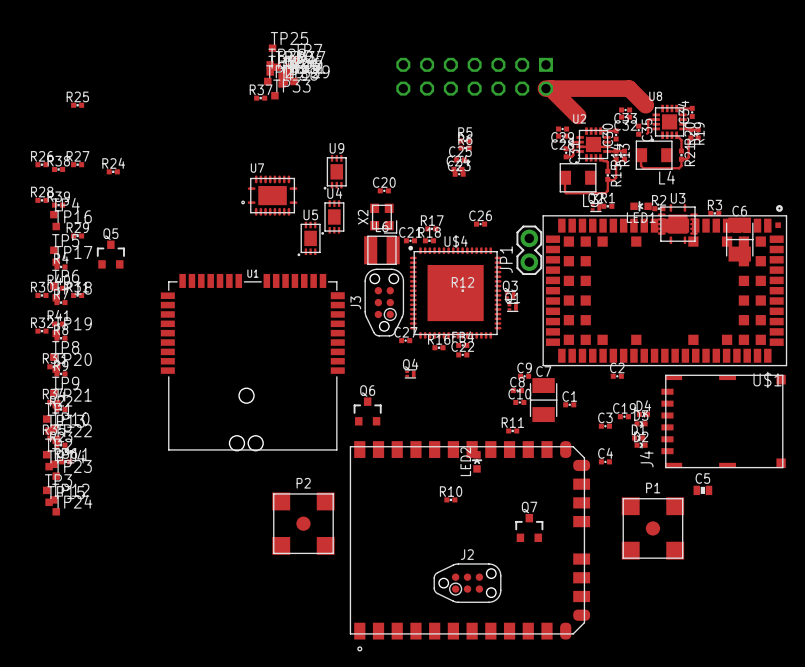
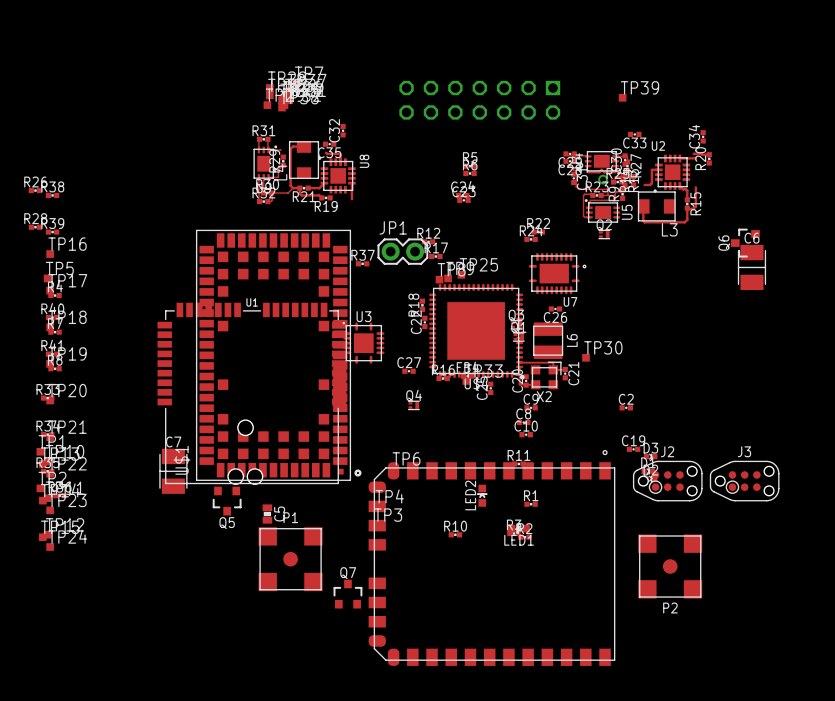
TP25 position: (272, 48) -> (461, 274)
TP30 position: (277, 67) -> (585, 357)
TP39 position: (293, 81) -> (622, 97)
track: (545, 88) (629, 88) (645, 105) -> none
track: (550, 88) (578, 115) -> none
TP33 position: (274, 95) -> (466, 380)
R37 position: (260, 98) -> (362, 263)
R25 position: (77, 105) -> (617, 182)
track: (692, 108) (676, 108) -> none
track: none -> (259, 139) (258, 150)
track: none -> (267, 139) (268, 150) (280, 150)
C32 rotation: 0° (625, 117) -> 90° clockwise (343, 130)
C32 position: (625, 117) -> (343, 130)
track: (656, 119) (648, 120) (647, 133) -> none
track: none -> (304, 147) (293, 146) (290, 149) (290, 185) (293, 188)
U8 rotation: 0° (668, 123) -> 90° clockwise (337, 175)
U8 position: (668, 123) -> (337, 175)
track: none -> (325, 152) (339, 153) (340, 162)
track: none -> (568, 155) (588, 156)
track: (616, 130) (600, 130) -> (695, 158) (679, 158)
C35 rotation: 0° (638, 130) -> 90° clockwise (329, 144)
C35 position: (638, 130) -> (329, 144)
track: none -> (615, 156) (626, 156) (627, 161)
R19 rotation: 0° (690, 133) -> 90° clockwise (325, 197)
R19 position: (690, 133) -> (325, 197)
track: (676, 135) (681, 140) (681, 151) -> none
track: (690, 137) (688, 140) (688, 157) (681, 159) (681, 165) (679, 168) (643, 168) (641, 165) (641, 155) -> none
track: none -> (568, 164) (573, 170) (576, 170) (576, 186) (578, 189) (606, 189) (607, 195)
track: none -> (283, 165) (278, 170) (278, 177) (268, 177)
track: none -> (615, 166) (621, 173) (621, 182)
track: (580, 142) (573, 142) (573, 155) (566, 156) -> (658, 169) (651, 169) (651, 183) (644, 184)
U2 position: (592, 145) -> (671, 173)
track: none -> (258, 177) (259, 201)
track: none -> (263, 177) (263, 193)
via: none -> (603, 179)
L4 rotation: 0° (654, 155) -> 90° clockwise (304, 160)
L4 position: (654, 155) -> (304, 160)
R21 rotation: 0° (681, 155) -> 90° clockwise (304, 188)
R21 position: (681, 155) -> (304, 188)
track: none -> (324, 183) (319, 188) (308, 188)
track: none -> (351, 183) (352, 199)
track: (600, 157) (607, 162) (607, 171) -> (679, 186) (687, 190) (687, 199)
C25 rotation: 0° (460, 159) -> 90° clockwise (490, 388)
C25 position: (460, 159) -> (490, 388)
track: (616, 159) (616, 177) (613, 180) (607, 179) (607, 190) (605, 193) (566, 193) (565, 177) -> (695, 187) (695, 206) (693, 208) (687, 208) (687, 219) (684, 222) (644, 222) (643, 206)
track: none -> (293, 188) (299, 188) (301, 195) (319, 195) (321, 197)
track: none -> (293, 188) (288, 193) (271, 193) (272, 200) (267, 201)
R27 rotation: 0° (77, 164) -> 90° clockwise (627, 166)
R27 position: (77, 164) -> (627, 166)
track: none -> (622, 190) (615, 193) (615, 200) (590, 200) (589, 207)
track: none -> (592, 195) (583, 195) (583, 216) (589, 217)
track: none -> (601, 195) (615, 195)
R24 position: (113, 171) -> (531, 239)
U9 rotation: 0° (335, 172) -> 180° (265, 163)
U9 position: (335, 172) -> (265, 163)
R15 position: (607, 175) -> (687, 203)
L3 position: (578, 177) -> (656, 206)
C20 rotation: 0° (384, 190) -> 90° clockwise (526, 380)
C20 position: (384, 190) -> (526, 380)
U7 rotation: 0° (269, 195) -> 180° (557, 273)
U7 position: (269, 195) -> (557, 273)
R1 position: (607, 206) -> (531, 504)
LED1 position: (641, 206) -> (518, 528)
R2 position: (658, 208) -> (524, 537)
R3 position: (714, 213) -> (513, 533)
TP4 position: (53, 214) -> (377, 506)
C26 name position: C26 (480, 215) -> C26 (555, 317)
U4 rotation: 0° (332, 217) -> 90° counterclockwise (602, 162)
U4 position: (332, 217) -> (602, 162)
X2 rotation: 0° (383, 218) -> 90° counterclockwise (546, 375)
X2 position: (383, 218) -> (546, 375)
U3 position: (677, 223) -> (363, 342)
C26 position: (480, 224) -> (555, 308)
R29 rotation: 0° (77, 236) -> 90° clockwise (283, 161)
R29 position: (77, 236) -> (283, 161)
U5 rotation: 0° (309, 238) -> 90° clockwise (602, 210)
U5 position: (309, 238) -> (602, 210)
C21 rotation: 0° (410, 240) -> 90° clockwise (565, 373)
C21 position: (410, 240) -> (565, 373)
R18 rotation: 0° (429, 240) -> 90° clockwise (422, 305)
R18 position: (429, 240) -> (422, 305)
L6 rotation: 0° (381, 250) -> 90° clockwise (548, 340)
L6 position: (381, 250) -> (548, 340)
JP1 rotation: 0° (529, 250) -> 90° clockwise (402, 251)
JP1 position: (529, 250) -> (402, 251)
Q5 rotation: 0° (110, 254) -> 180° (227, 501)
Q5 position: (110, 254) -> (227, 501)
TP6 position: (53, 285) -> (394, 468)
U$1 rotation: 0° (664, 285) -> 90° clockwise (278, 355)
U$1 position: (664, 285) -> (278, 355)
R12 position: (462, 290) -> (428, 241)
U$4 rotation: 0° (454, 292) -> 180° (476, 331)
R30 position: (41, 295) -> (267, 193)
R31 position: (77, 295) -> (263, 139)
J3 rotation: 0° (384, 302) -> 90° clockwise (744, 481)
J3 position: (384, 302) -> (744, 481)
R32 position: (41, 331) -> (263, 201)
track: none -> (519, 362) (553, 362) (553, 369) (565, 369)
track: none -> (519, 366) (519, 384) (535, 384)
C22 rotation: 0° (462, 354) -> 90° clockwise (424, 322)
C22 position: (462, 354) -> (424, 322)
TP8 position: (53, 357) -> (439, 279)
R9 rotation: 0° (60, 373) -> 90° clockwise (622, 194)
R9 position: (60, 373) -> (622, 194)
TP9 position: (53, 392) -> (448, 278)
C7 position: (543, 400) -> (173, 471)
C1: (569, 404) -> none
R22 position: (60, 409) -> (538, 232)
Q6 rotation: 0° (367, 411) -> 90° counterclockwise (745, 243)
Q6 position: (367, 411) -> (745, 243)
D4: (643, 414) -> none
J4: (723, 421) -> none
C3: (605, 426) -> none
R23 position: (60, 445) -> (596, 195)
C4: (605, 461) -> none
P2 name position: P2 (303, 483) -> P2 (670, 608)
TP3 position: (46, 490) -> (376, 525)
C5 rotation: 0° (702, 490) -> 90° clockwise (267, 514)
C5 position: (702, 490) -> (267, 514)
P2 position: (303, 523) -> (670, 566)
Q7 position: (529, 527) -> (347, 594)
P1 position: (652, 528) -> (290, 559)
part rotation: 0° (469, 546) -> 180° (491, 558)
J2 position: (467, 583) -> (667, 481)

